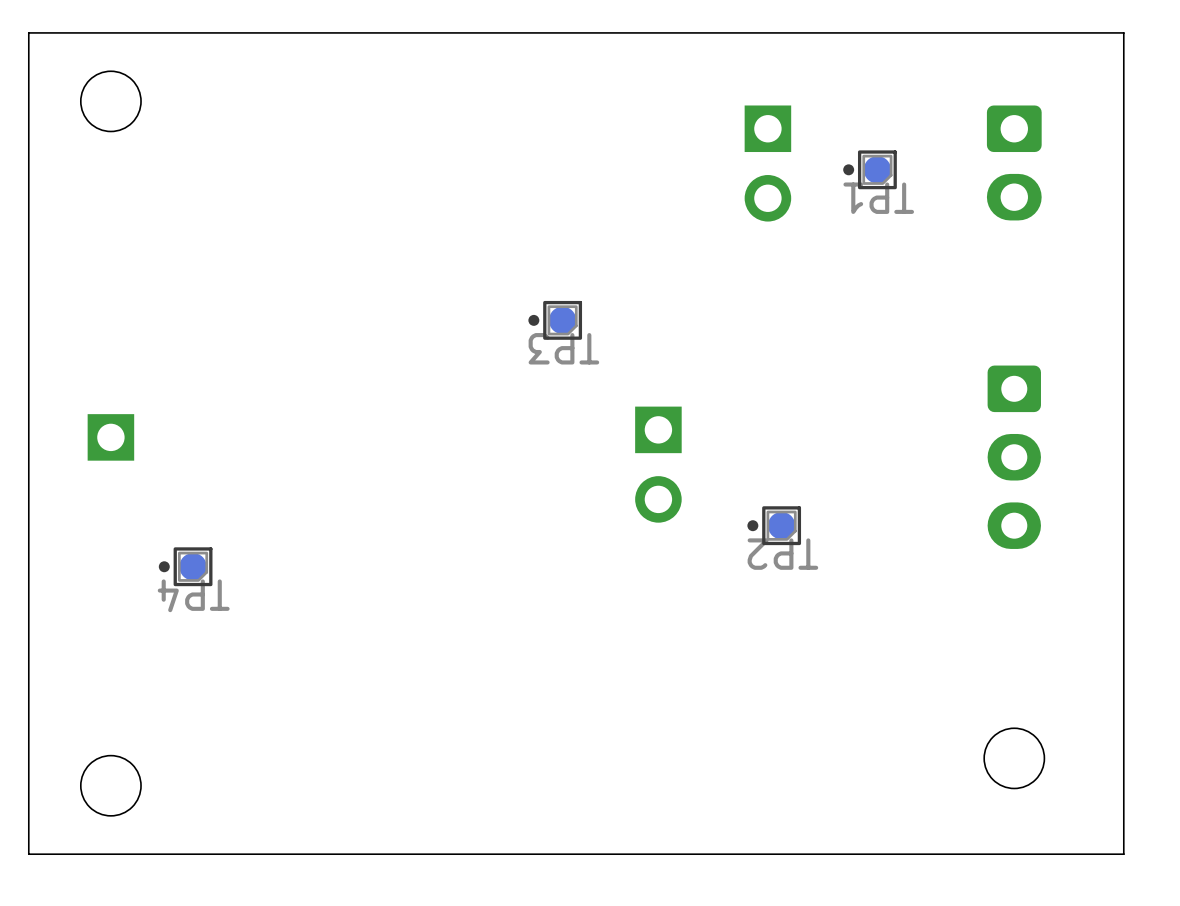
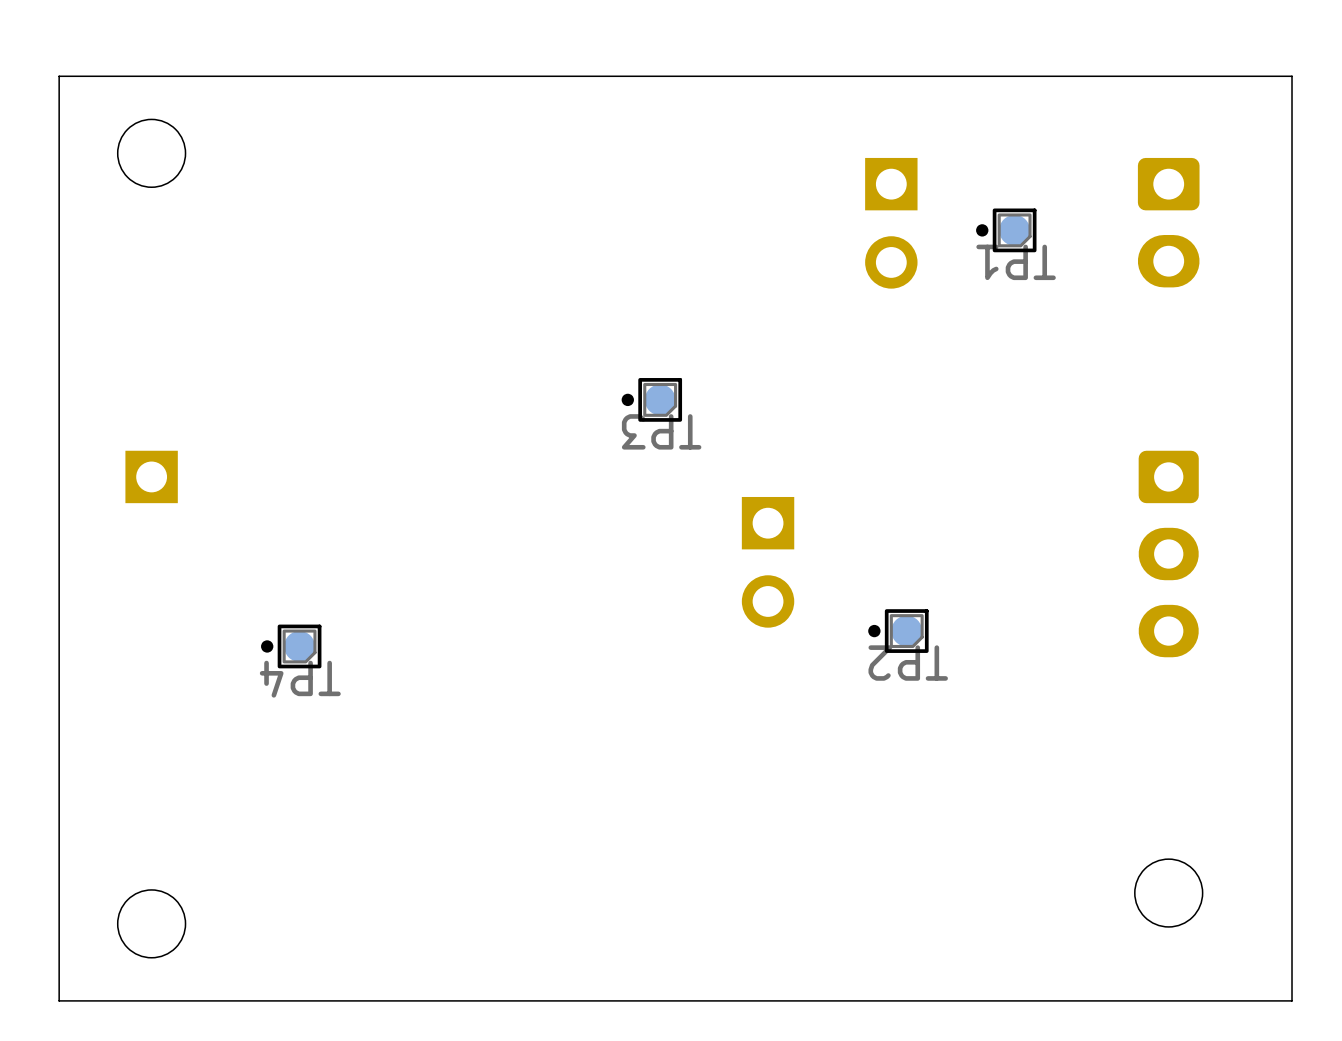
part position: (110, 437) -> (151, 476)
TP4 position: (185, 566) -> (291, 646)

